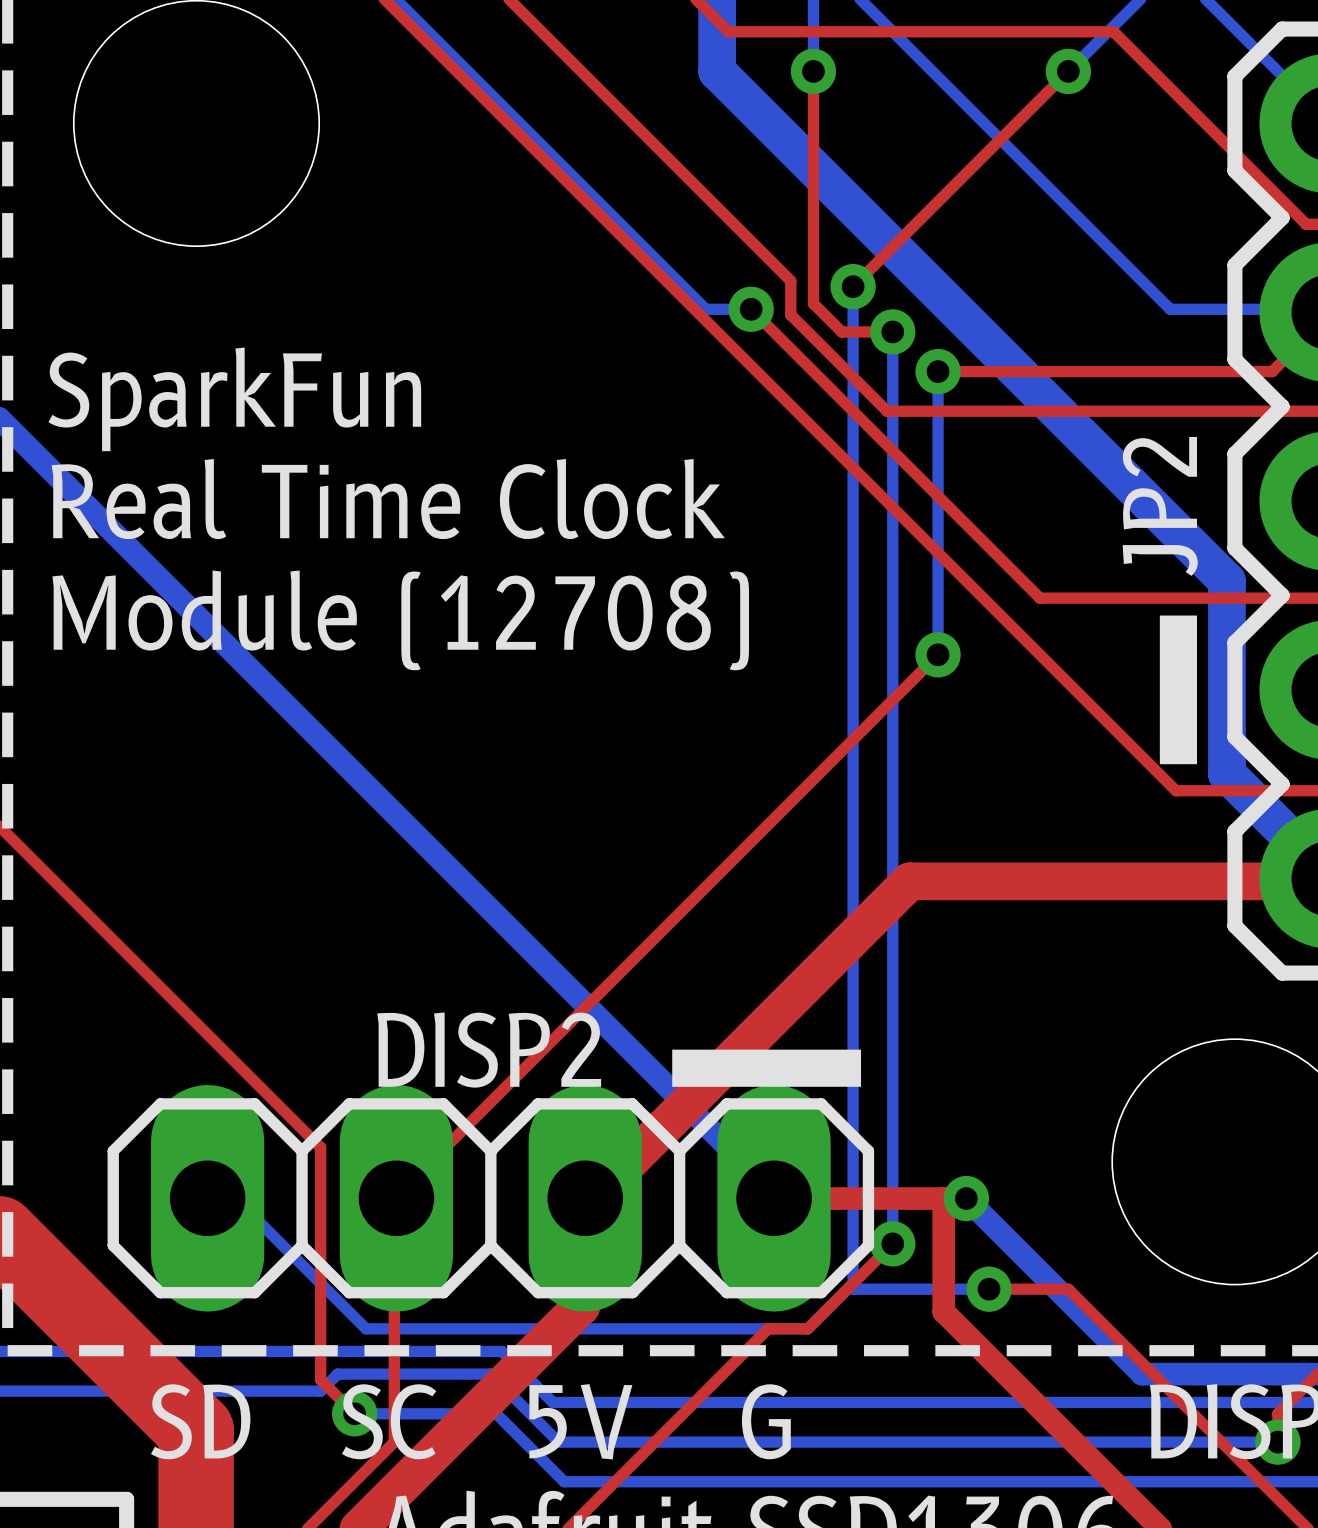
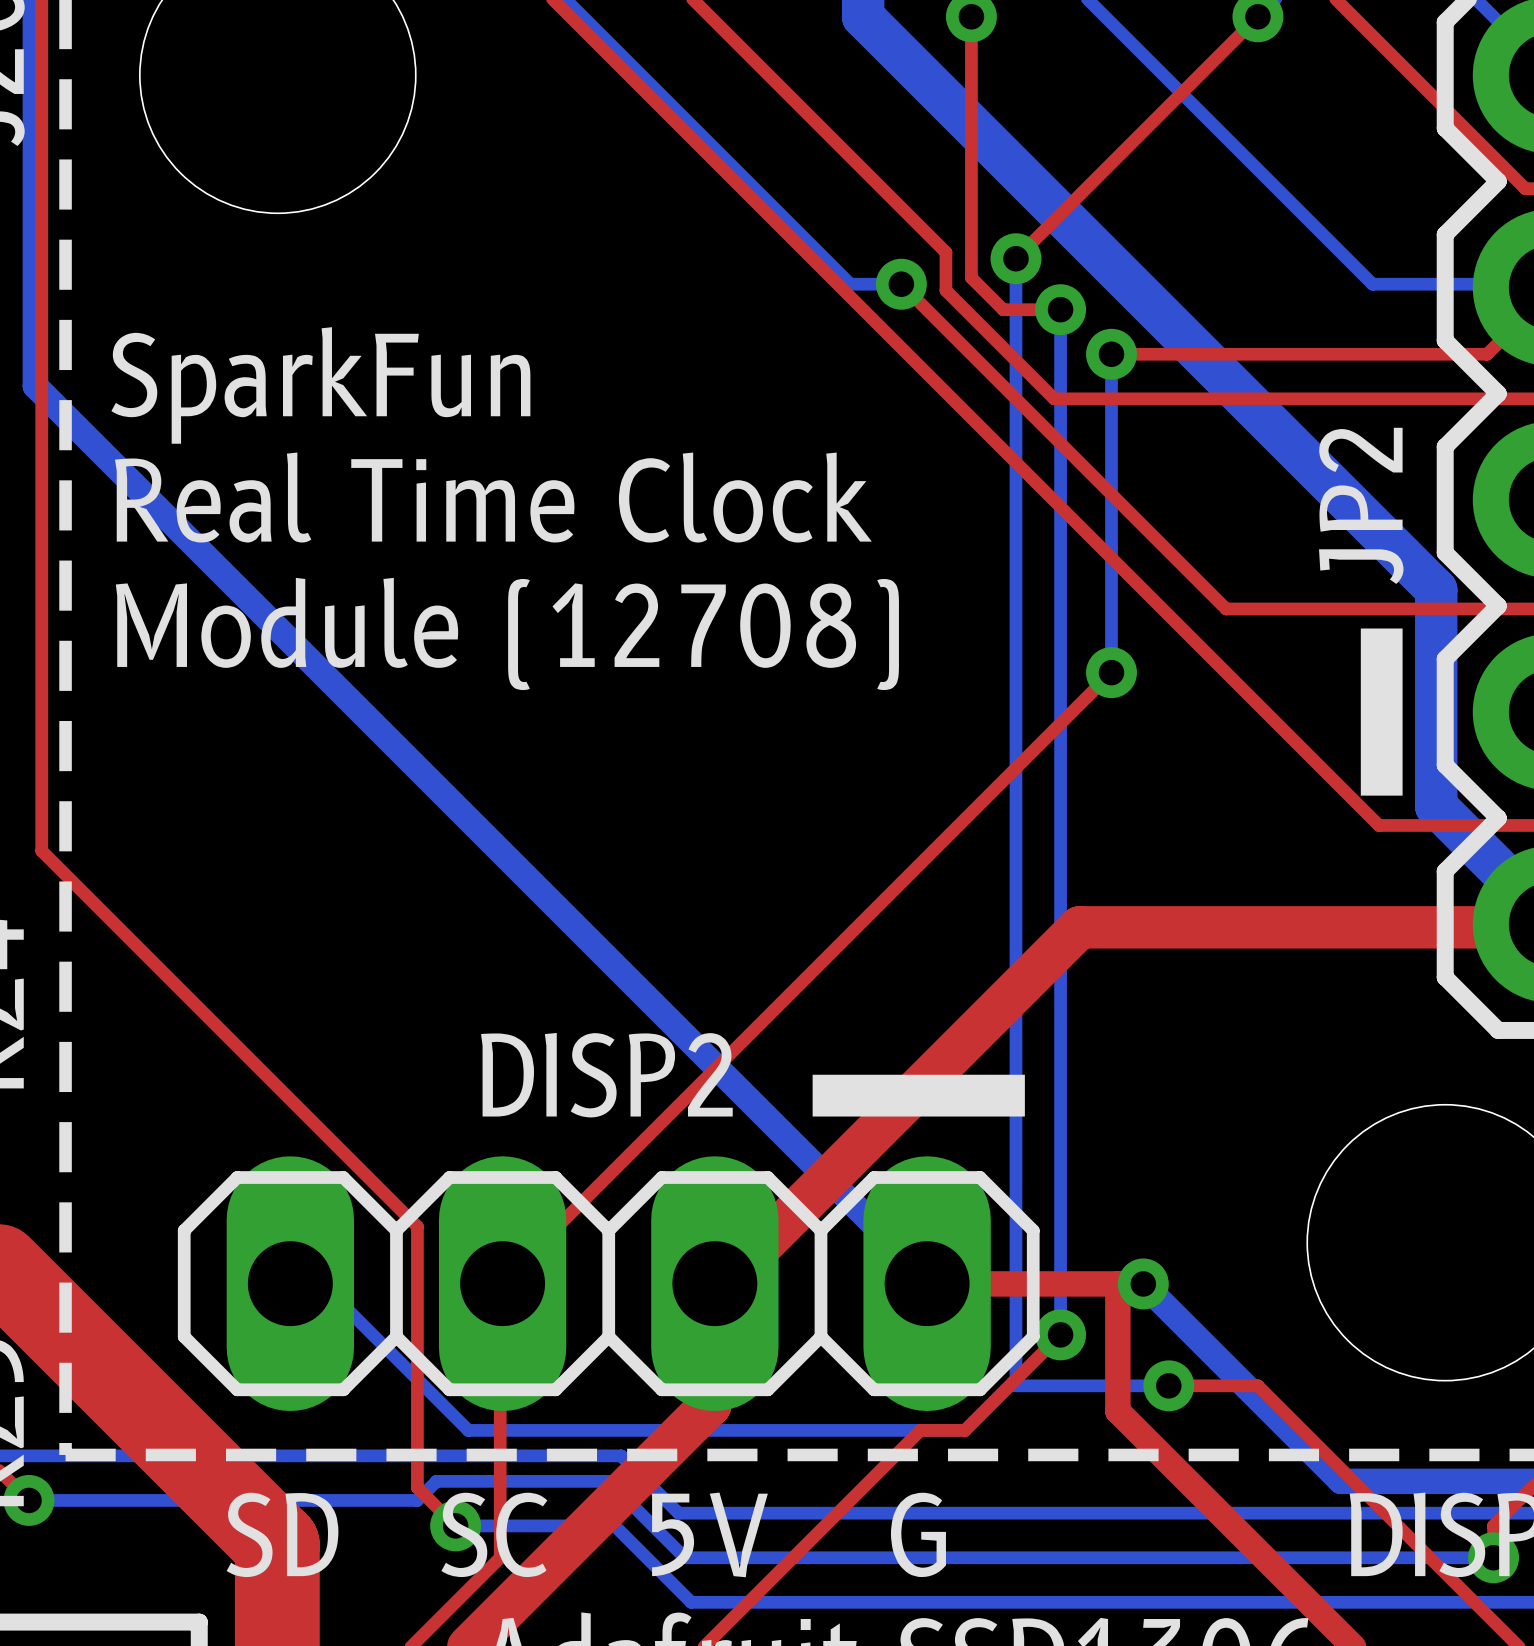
DISP2 name position: DISP2 (489, 1050) -> DISP2 (606, 1075)
drawing position: (766, 1068) -> (918, 1095)

